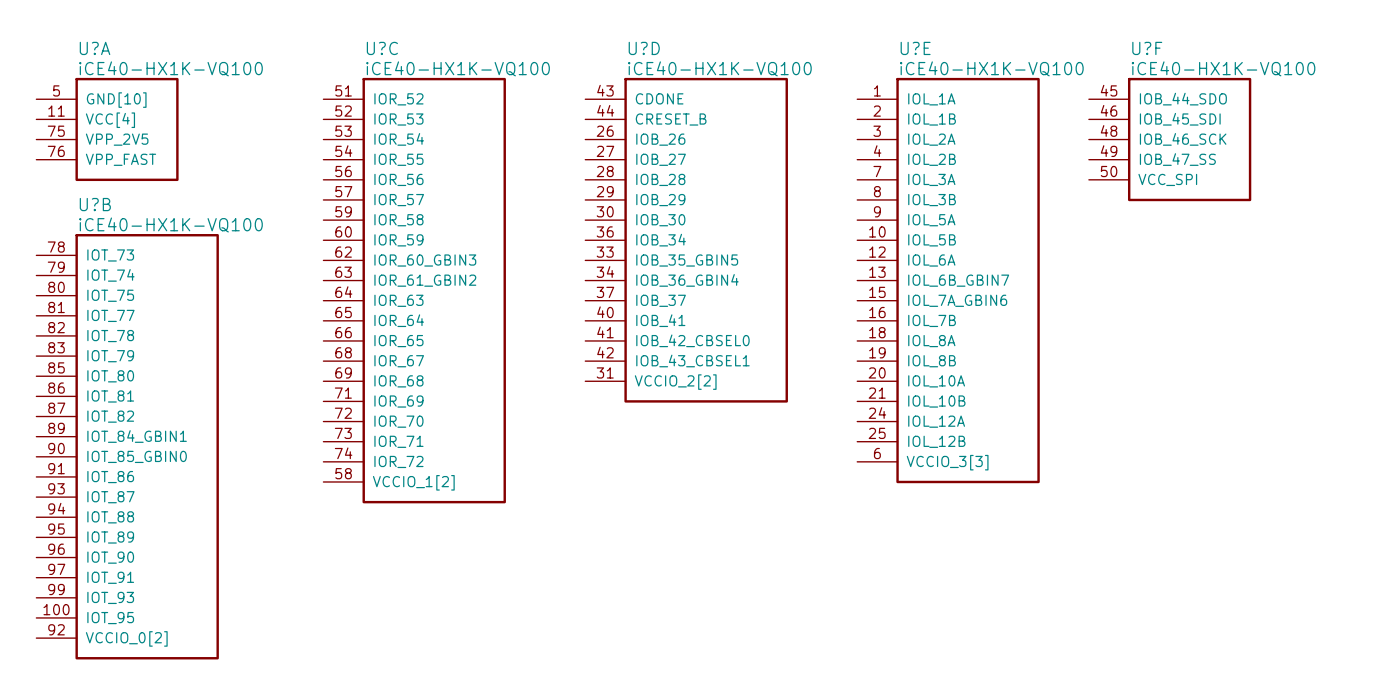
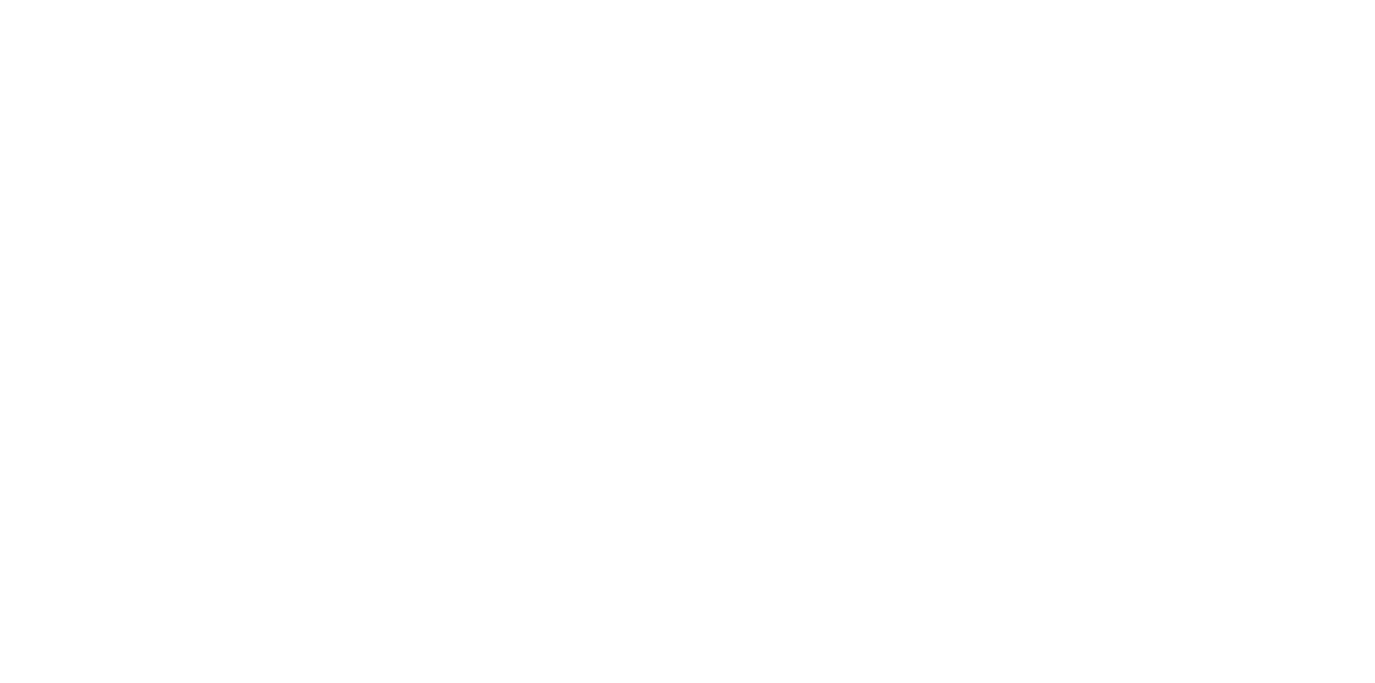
U?A: iCE40-HX1K-VQ100 (107, 129) -> none
U?F: iCE40-HX1K-VQ100 (1170, 139) -> none
U?D: iCE40-HX1K-VQ100 (686, 240) -> none
U?E: iCE40-HX1K-VQ100 (948, 280) -> none
U?C: iCE40-HX1K-VQ100 (414, 290) -> none
U?B: iCE40-HX1K-VQ100 (127, 446) -> none

